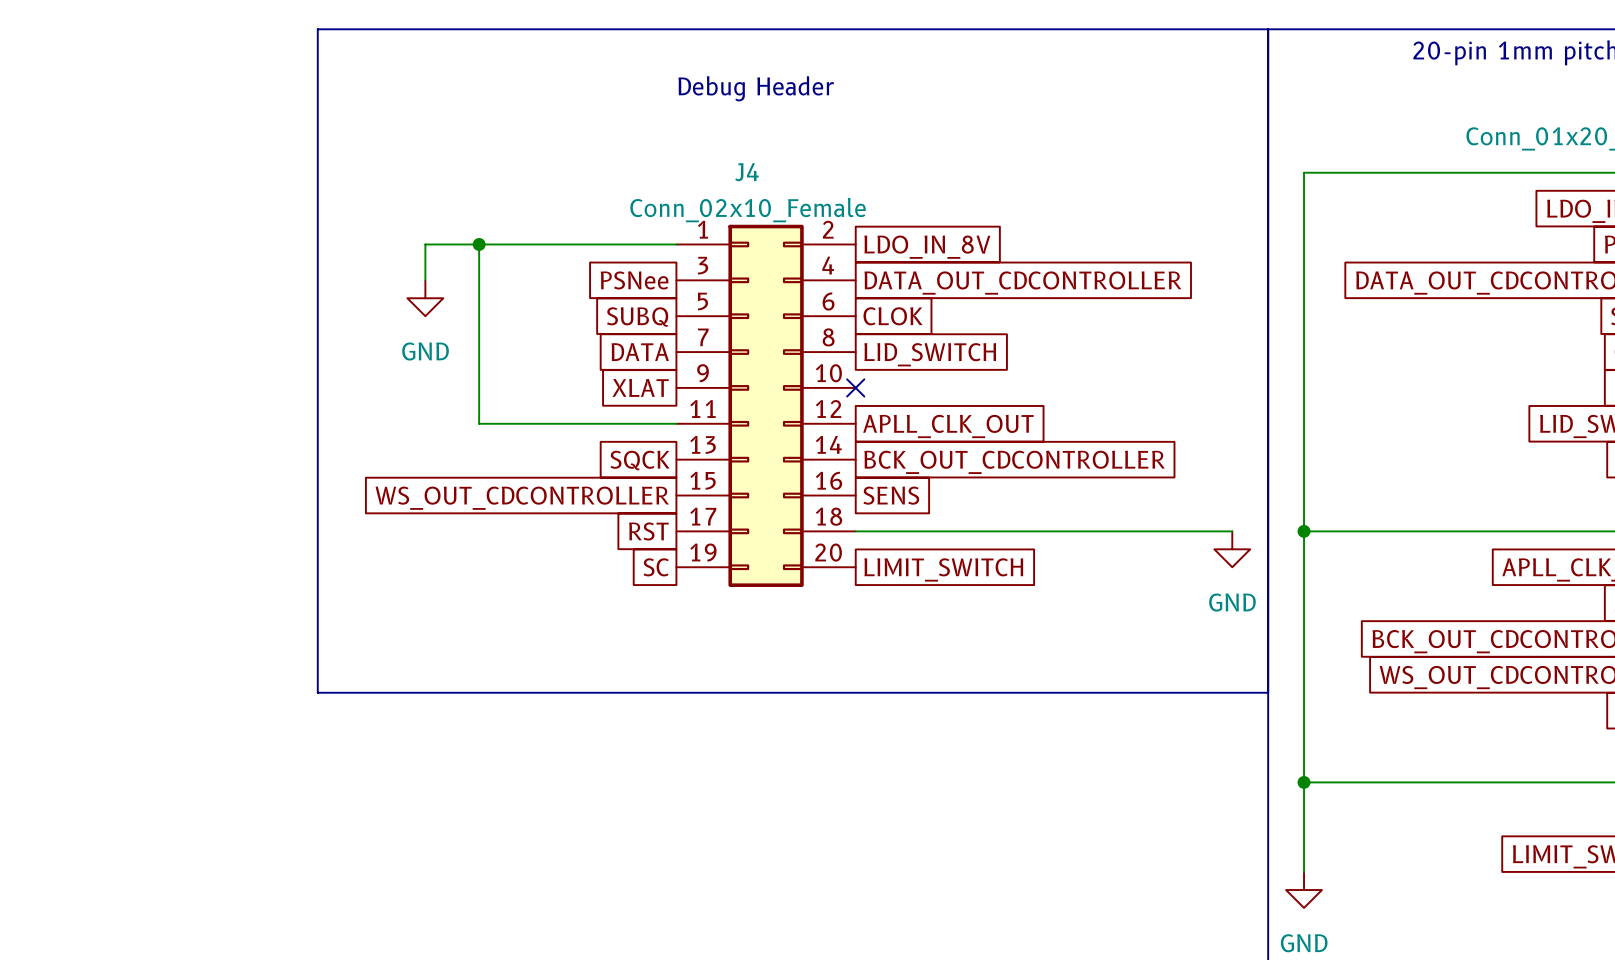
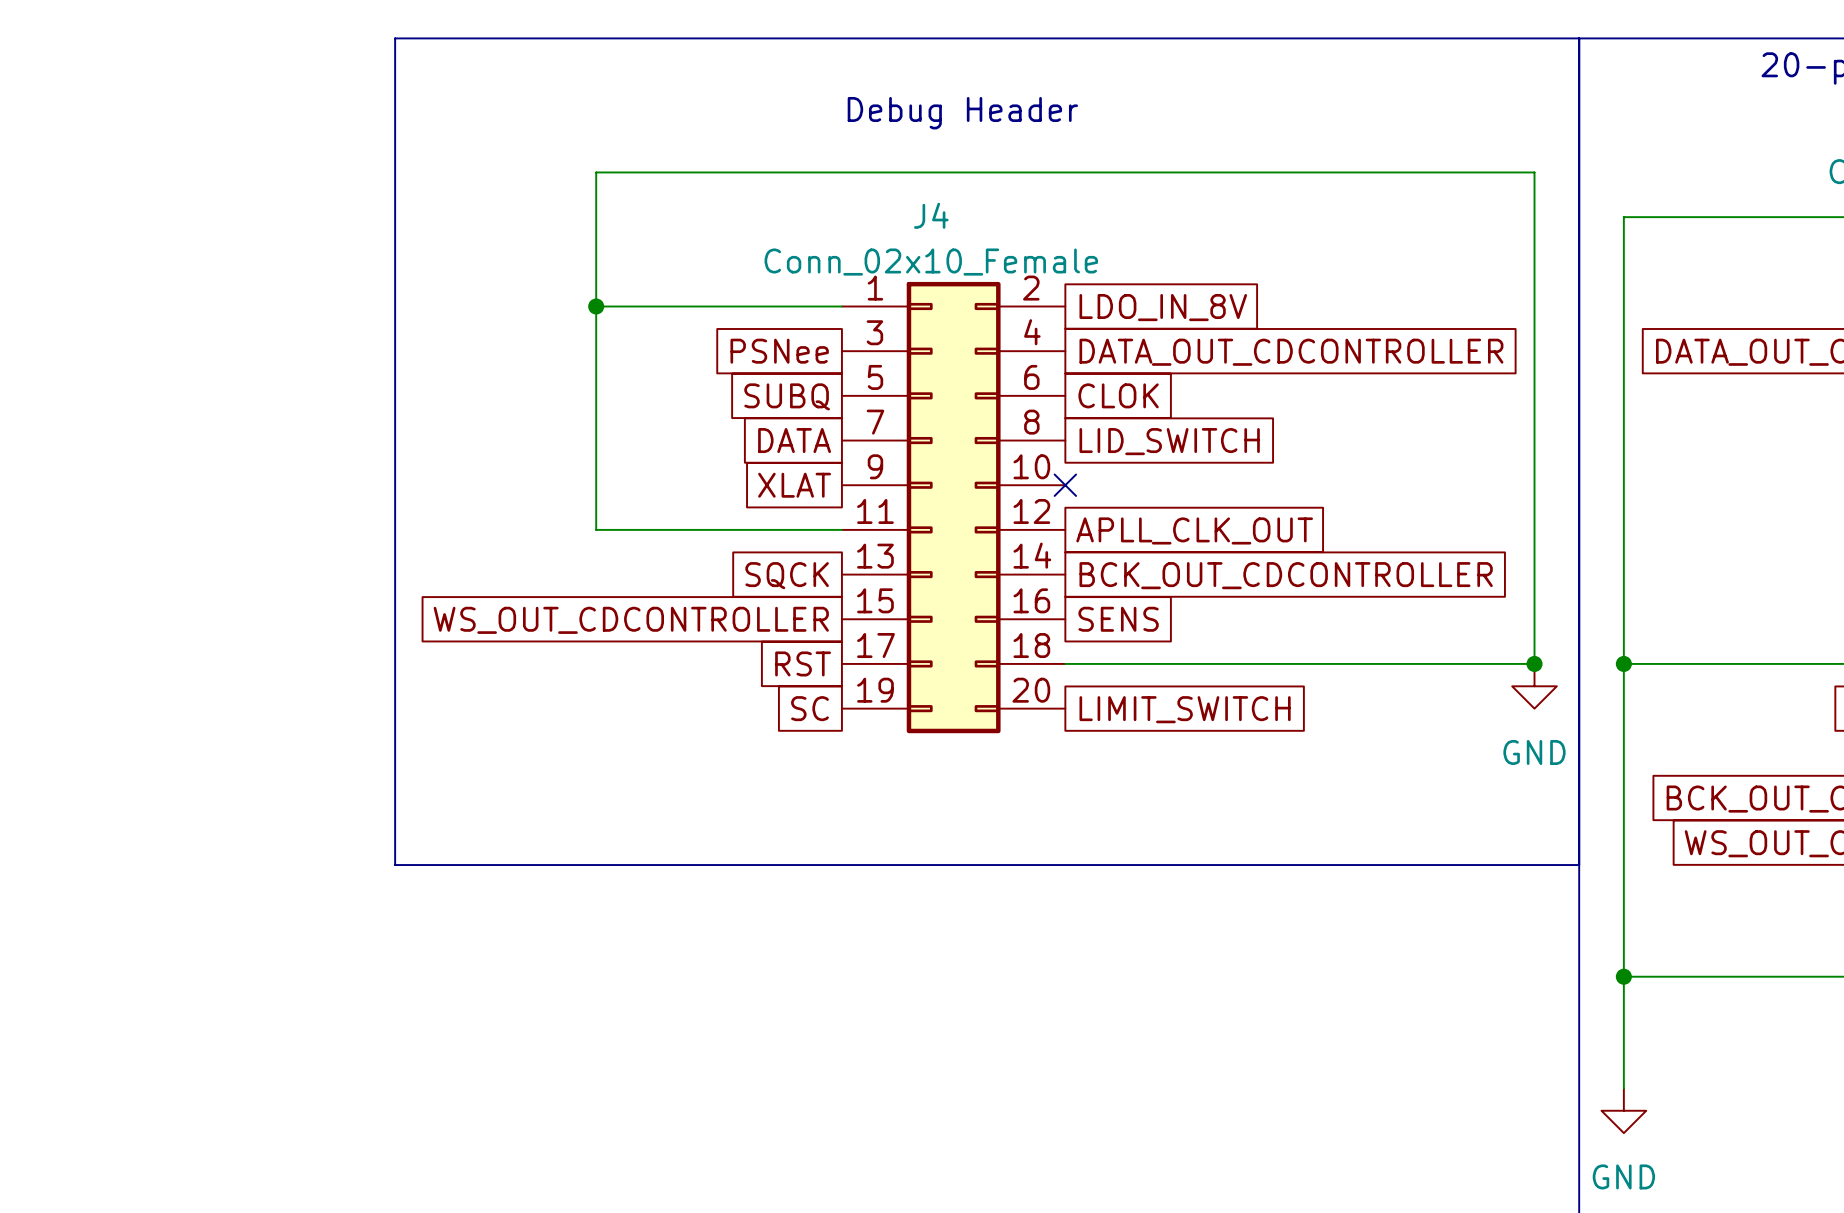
wire: (479, 244) (425, 244) (425, 280) -> (596, 306) (596, 172) (1534, 172) (1534, 663)
power symbol: GND (425, 298) -> none
junction: none -> (1534, 663)

